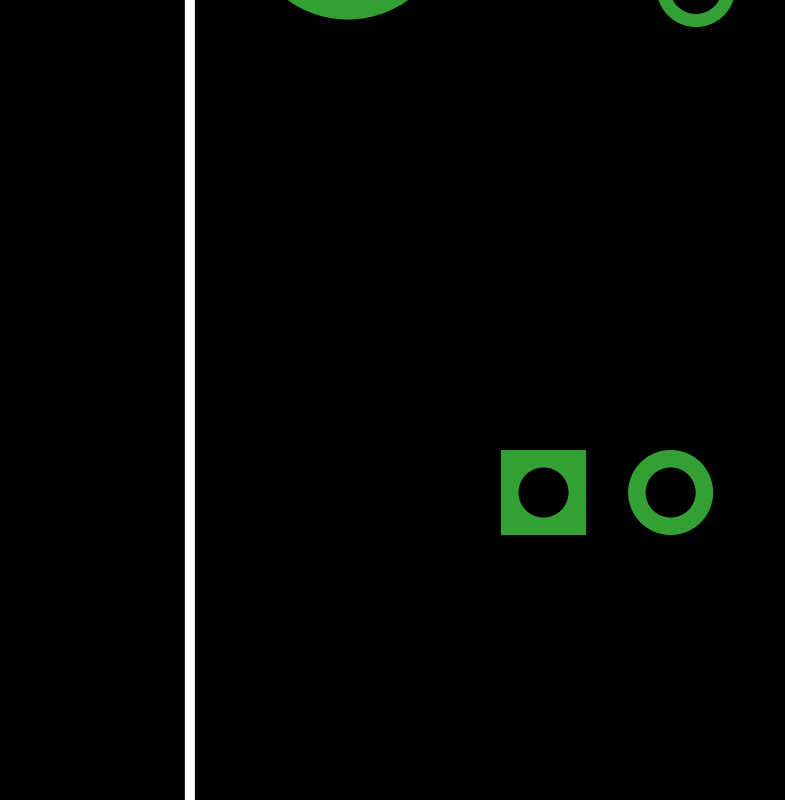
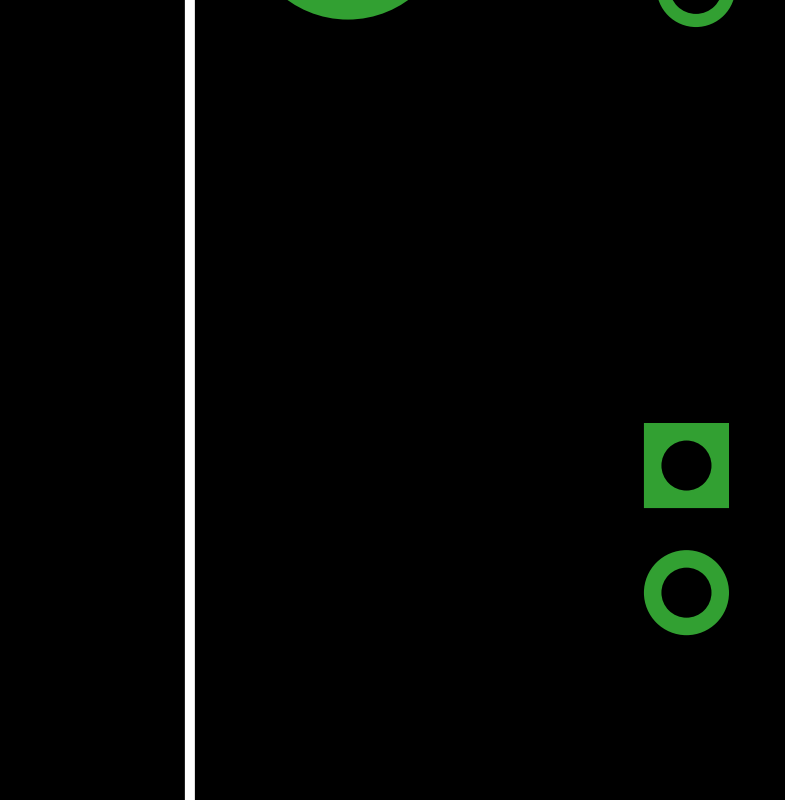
part rotation: 0° (607, 492) -> 90° clockwise (686, 529)

